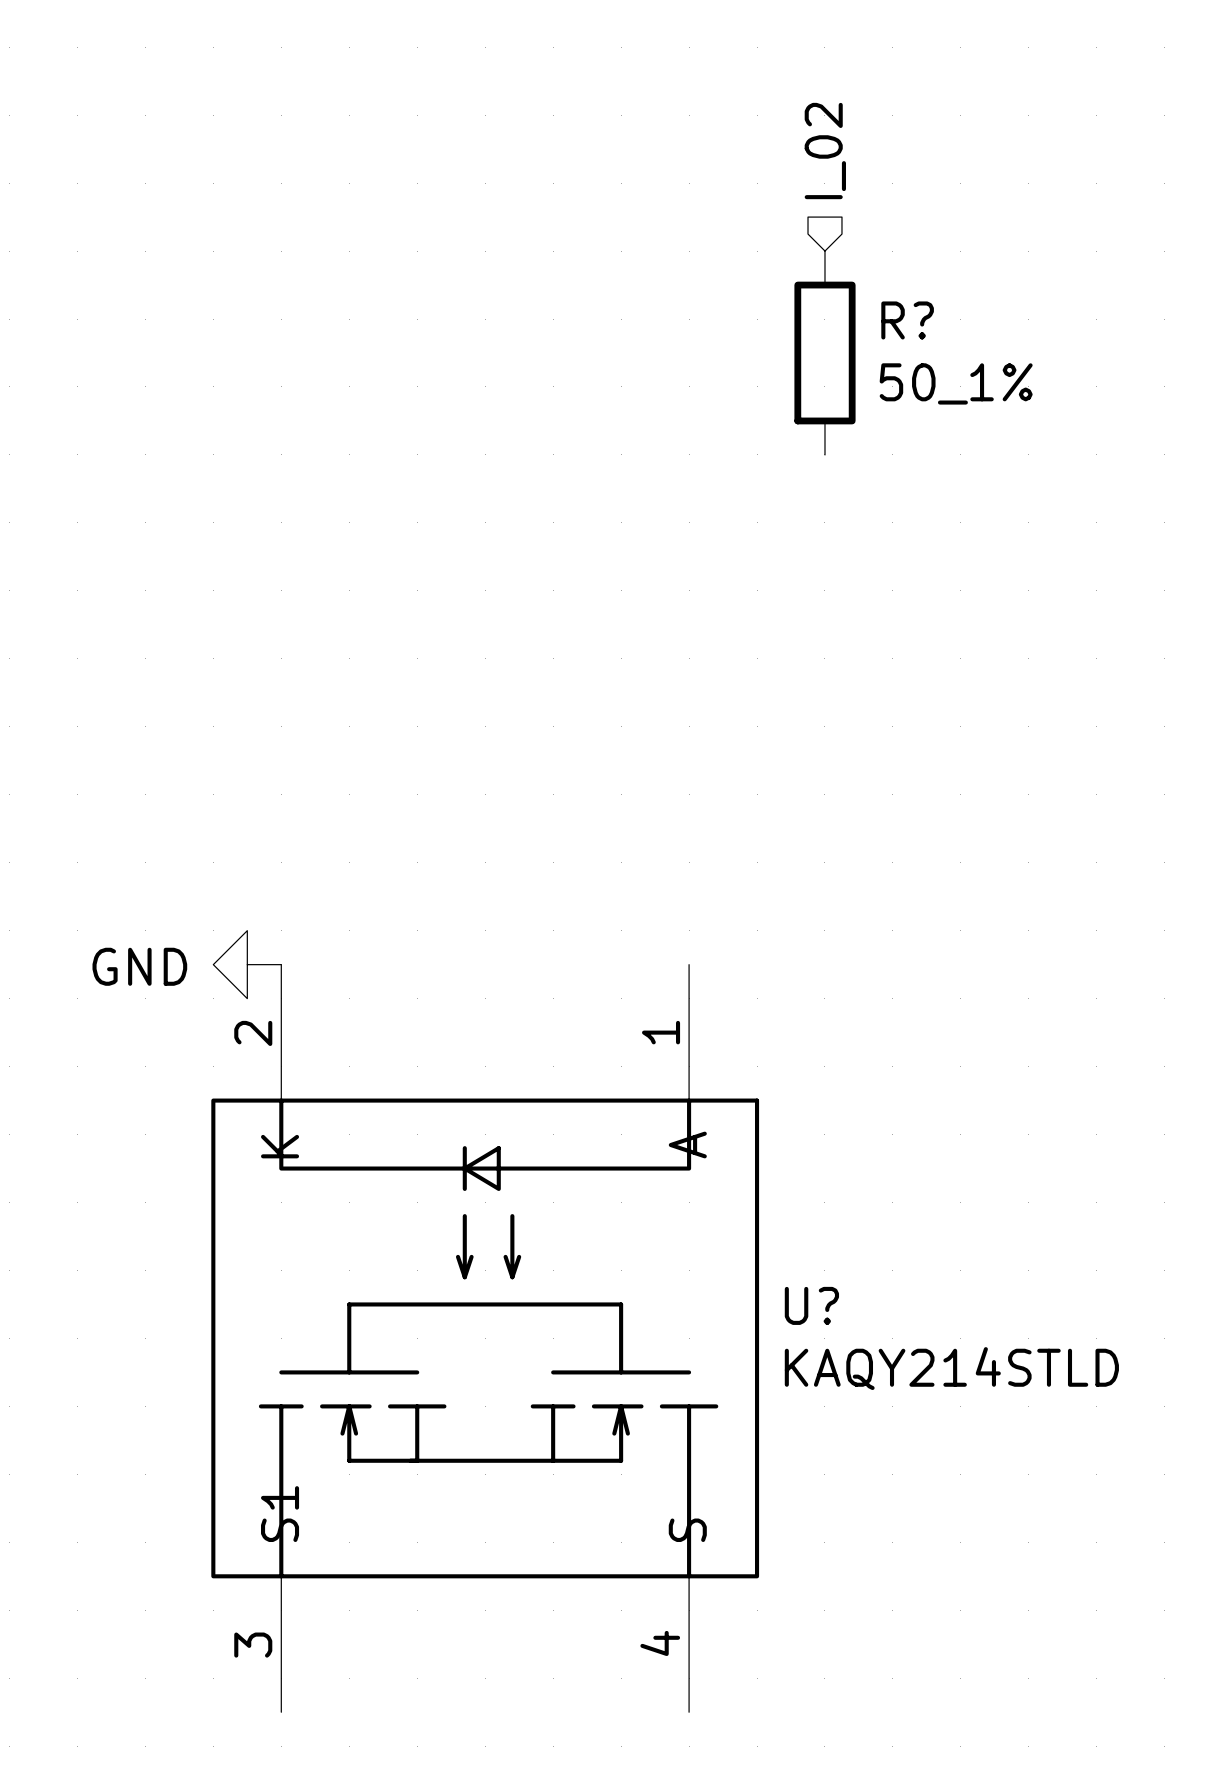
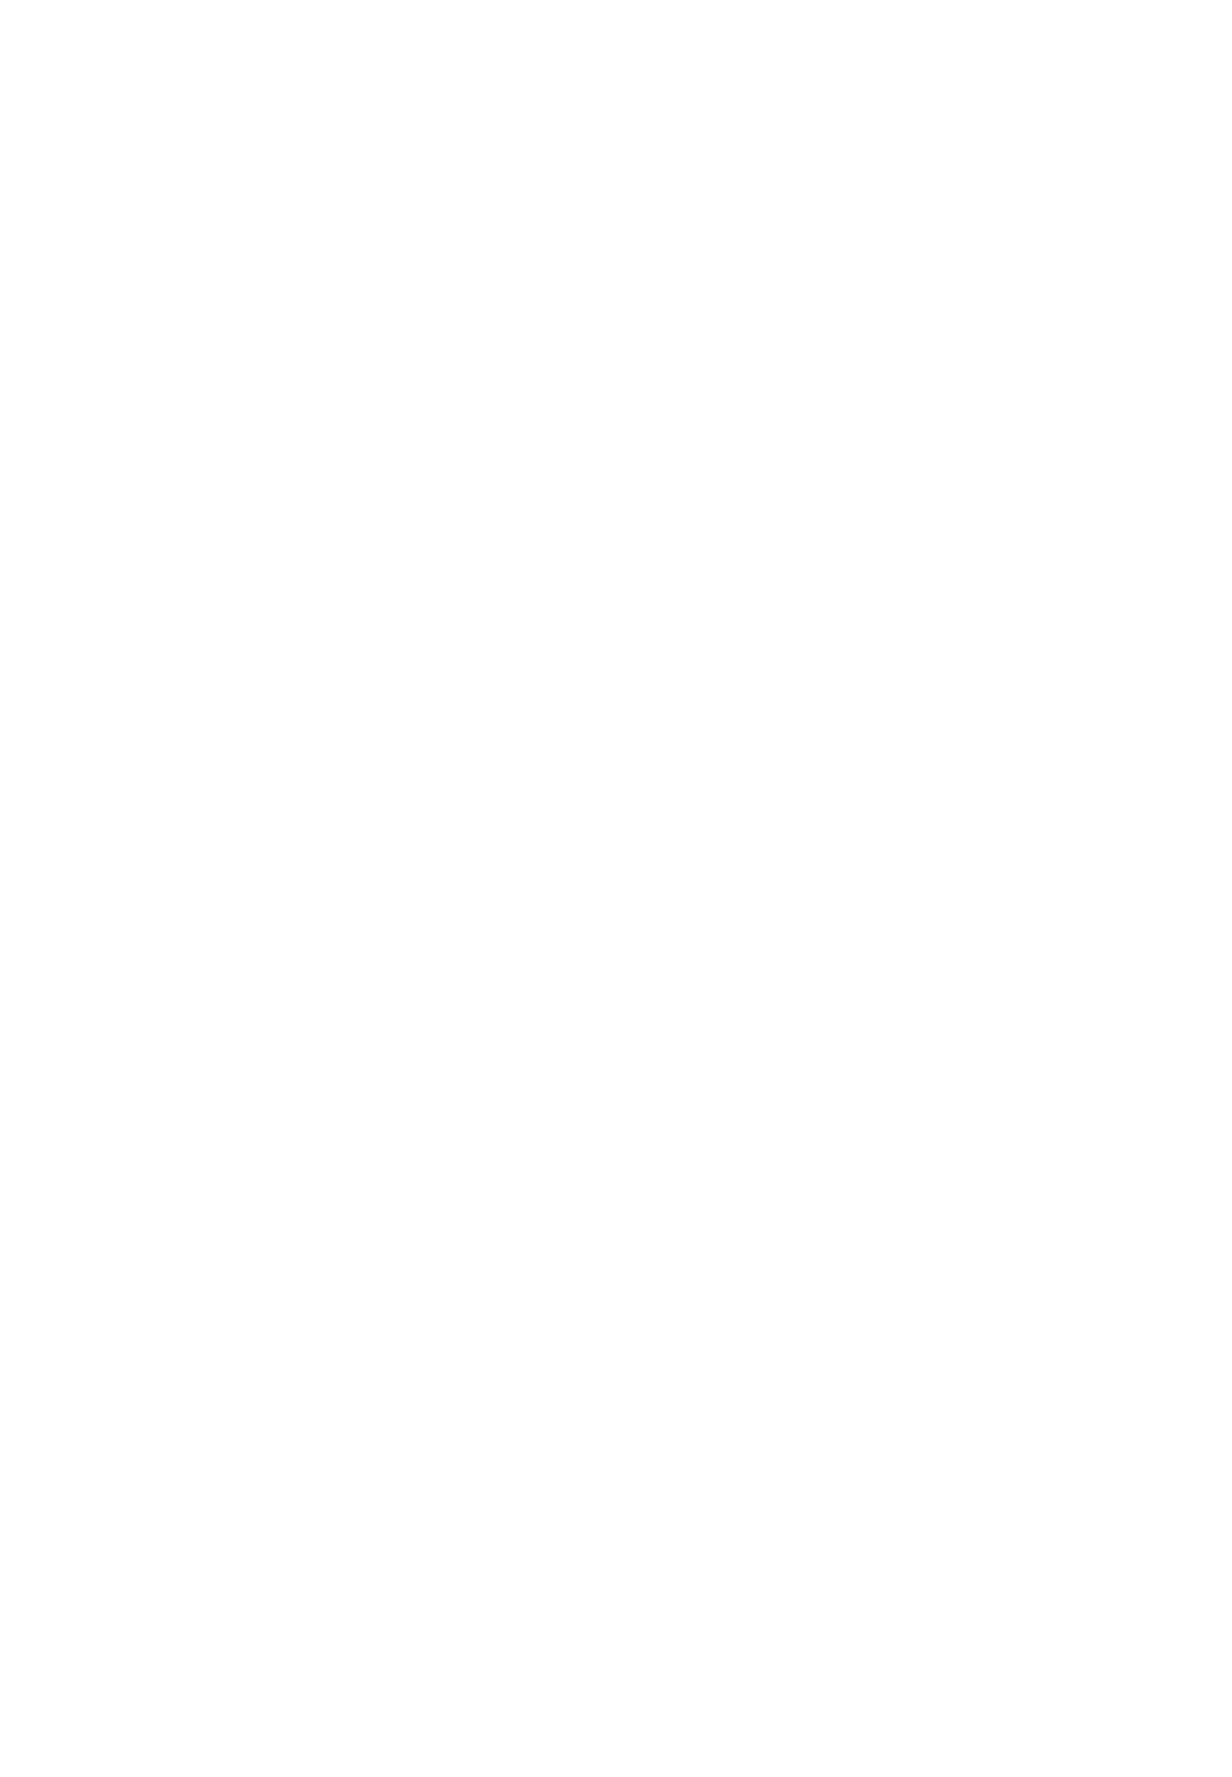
hierarchical label: I_02 (825, 151) -> none
R?: 50_1% (824, 353) -> none
power symbol: GND (247, 964) -> none
U?: KAQY214STLD (485, 1338) -> none

